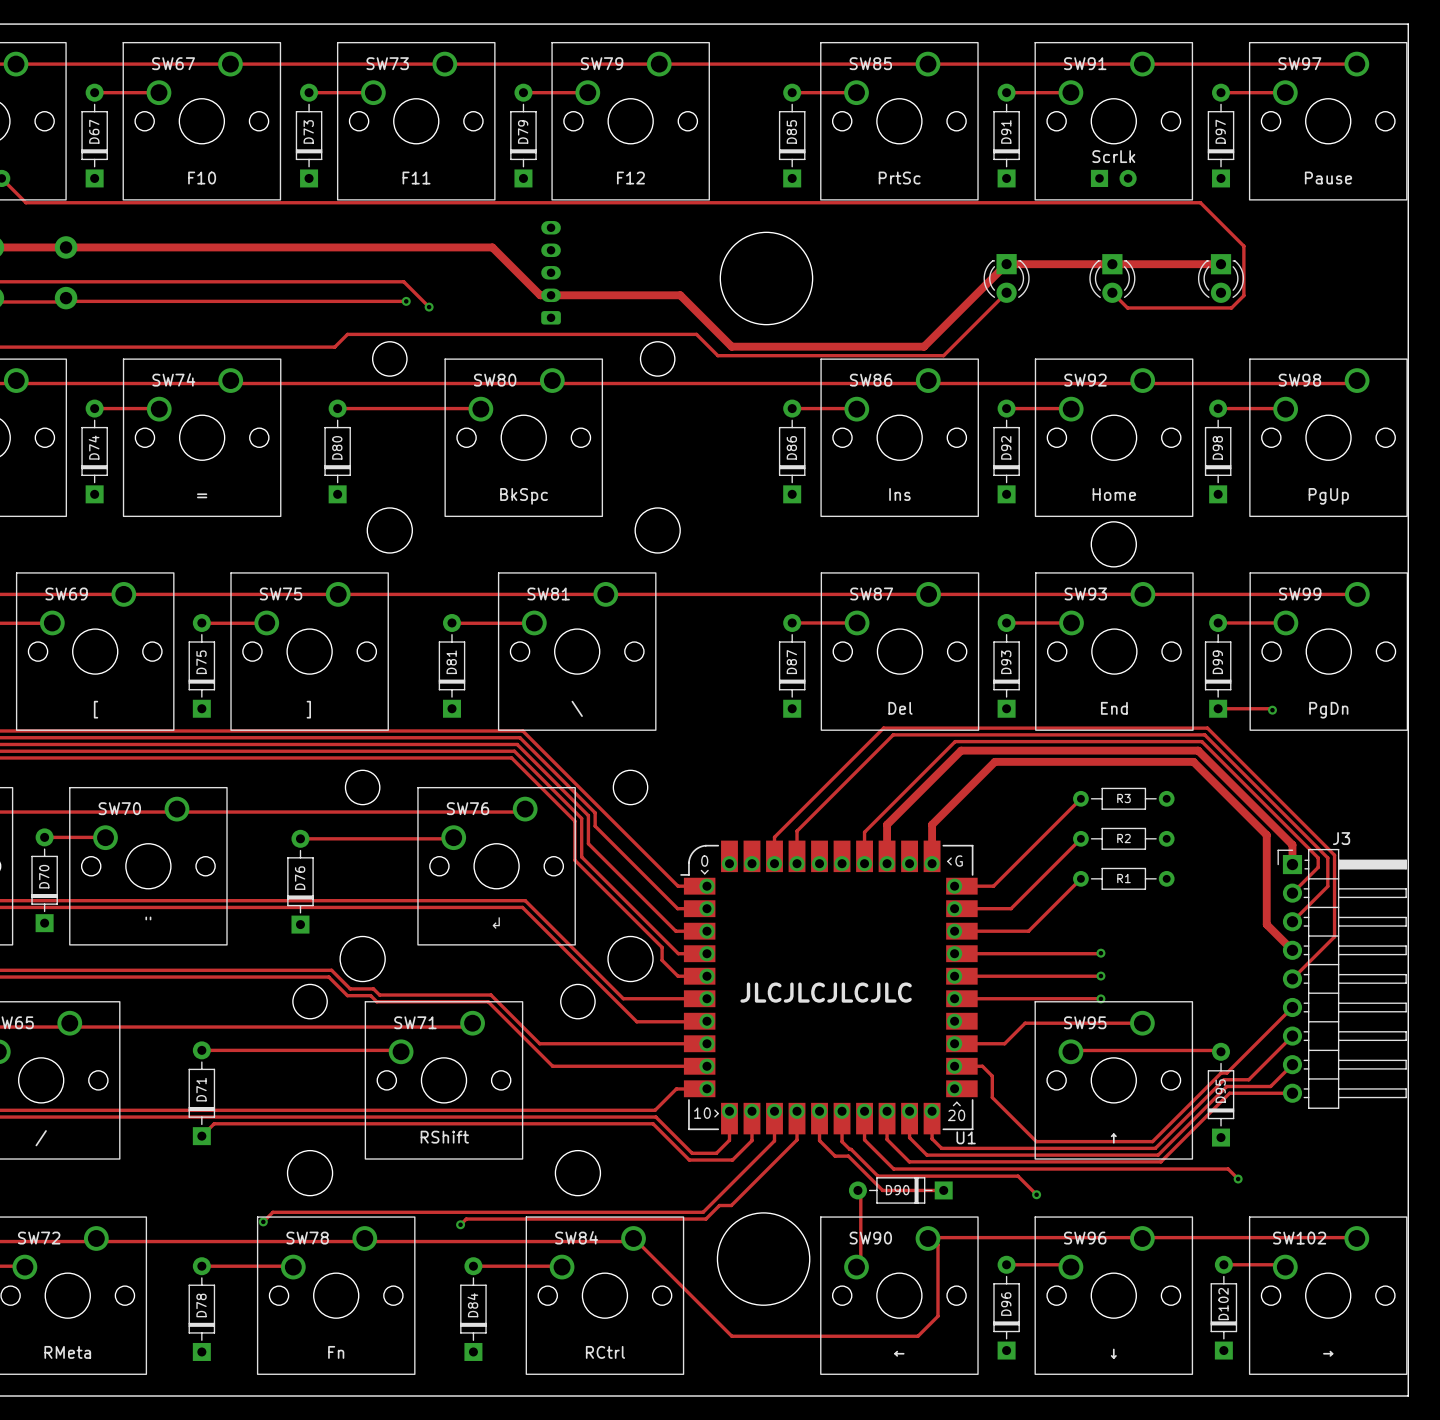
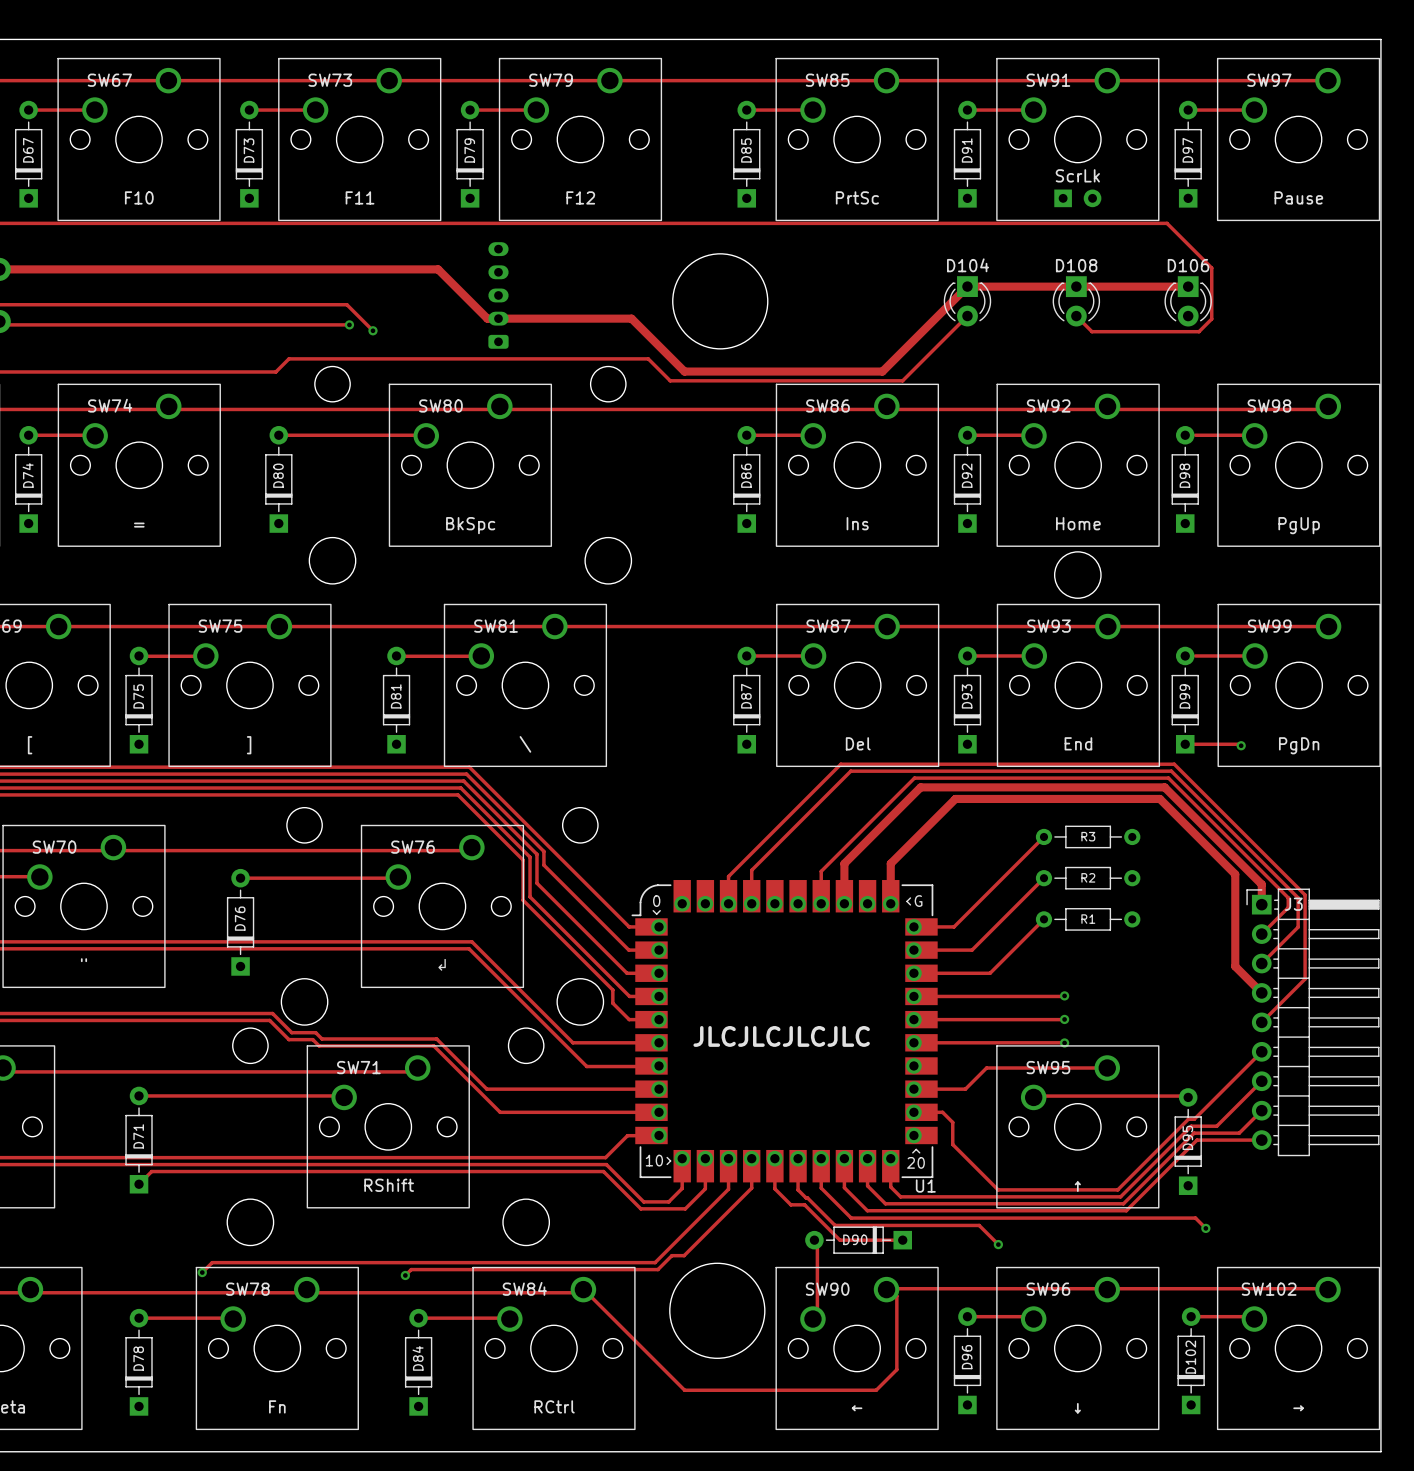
D104 name: none -> D104 (968, 265)
D108 name: none -> D108 (1076, 265)
D106 name: none -> D106 (1188, 265)
J3 name position: J3 (1341, 838) -> J3 (1293, 904)

